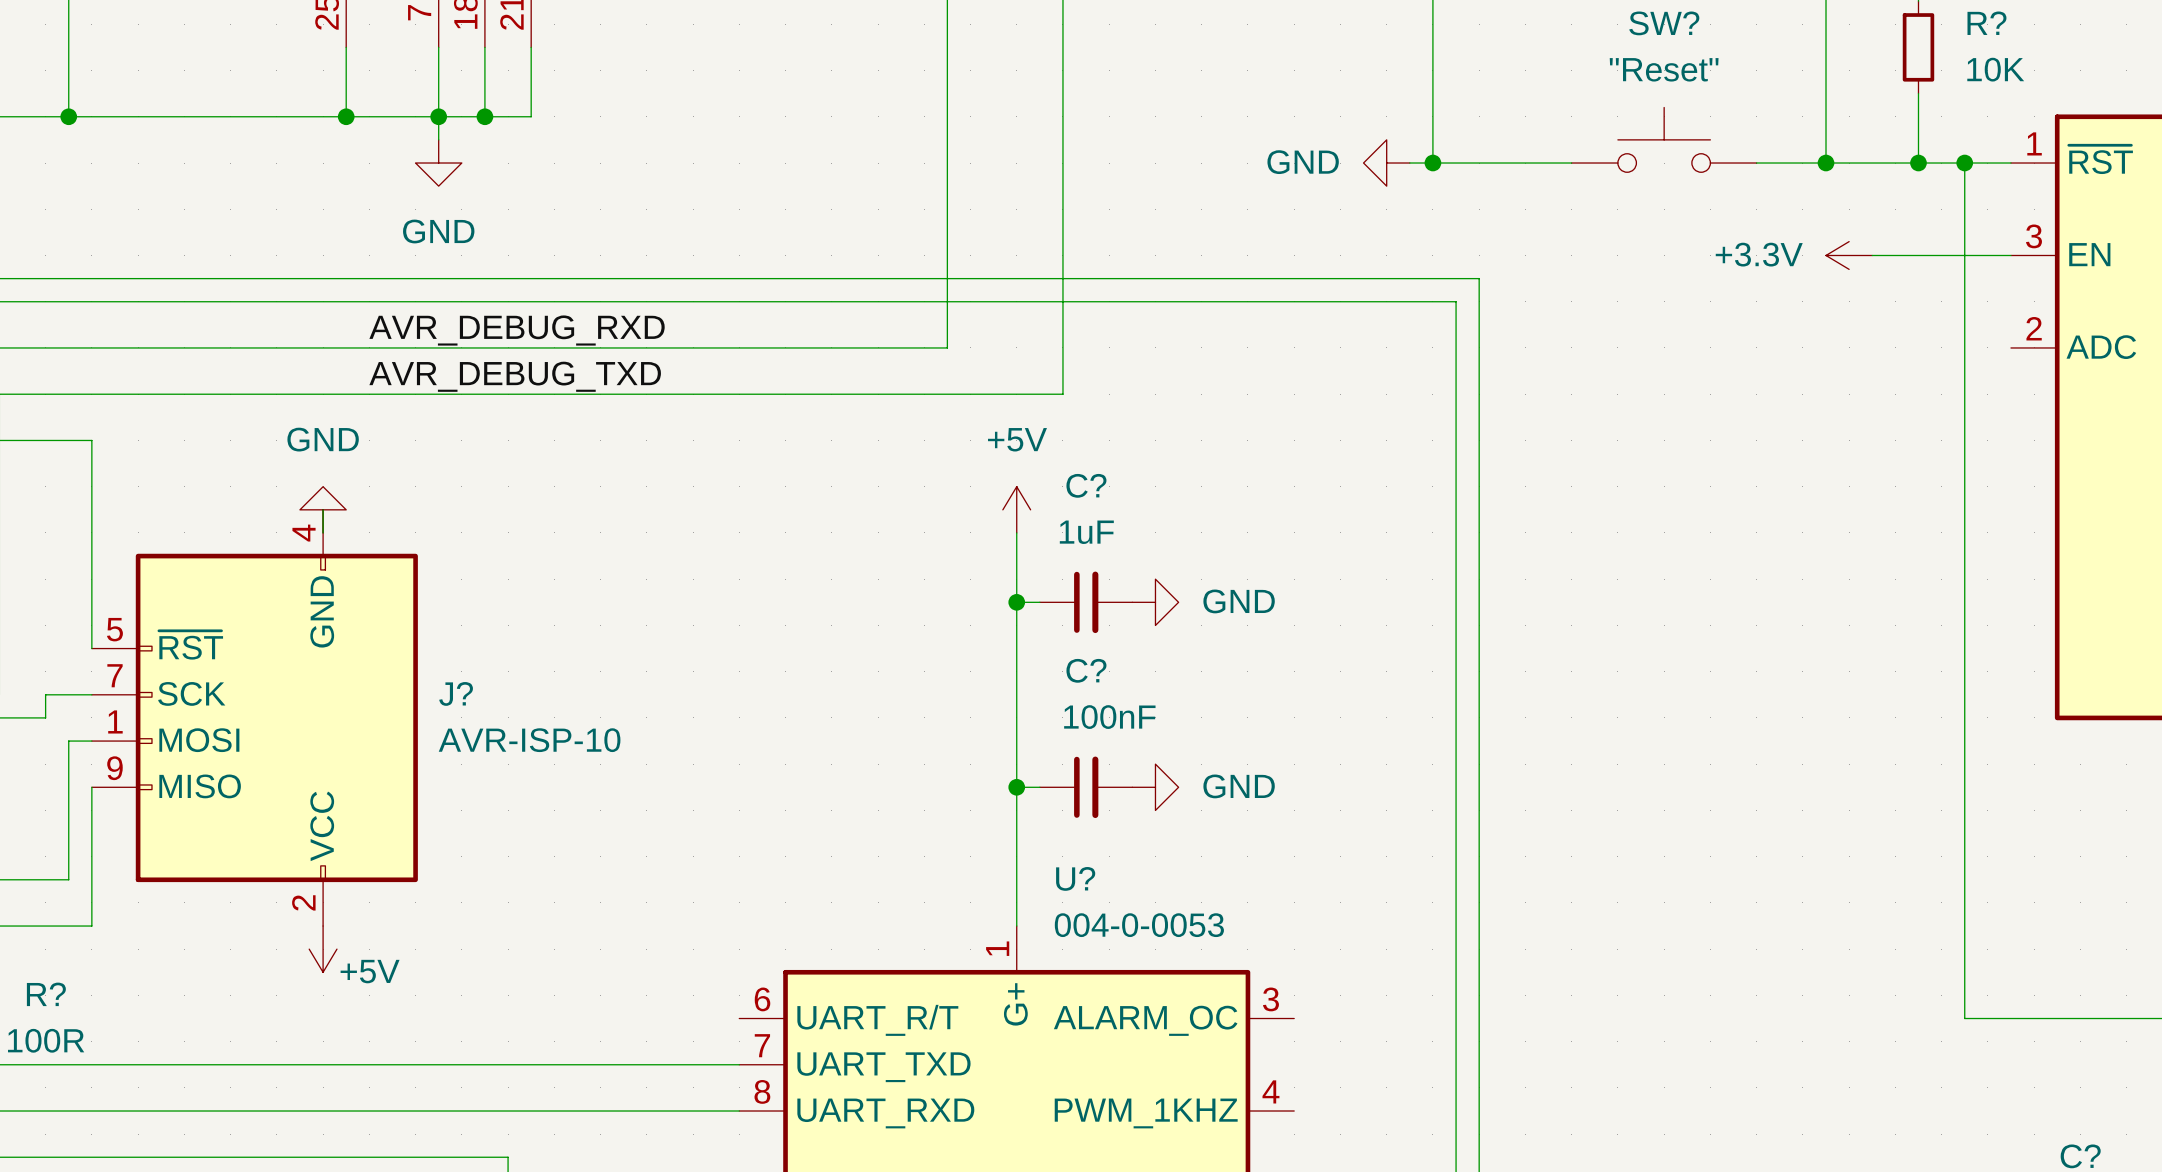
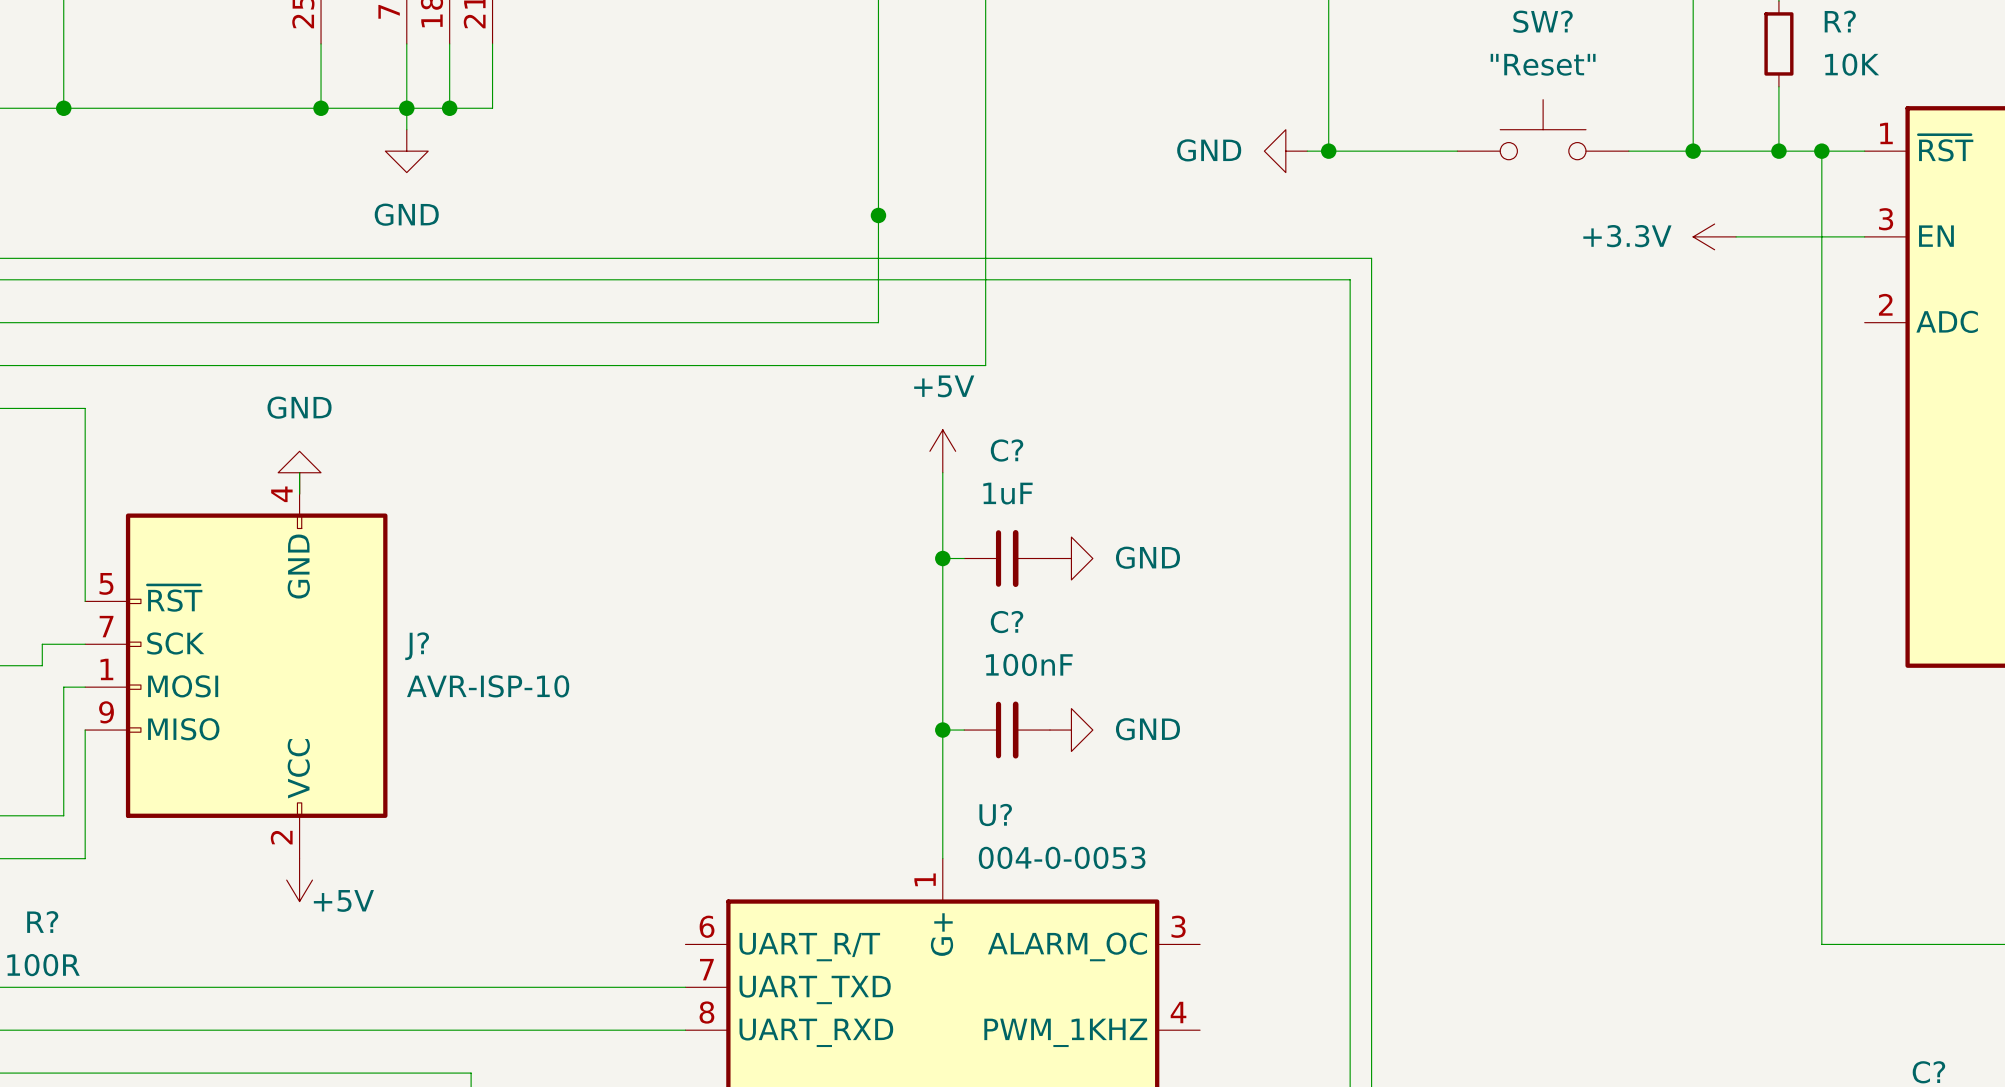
junction: none -> (878, 215)
label: AVR_DEBUG_RXD (517, 330) -> none
label: AVR_DEBUG_TXD (515, 376) -> none
power symbol position: +5V (1016, 509) -> +5V (942, 451)

